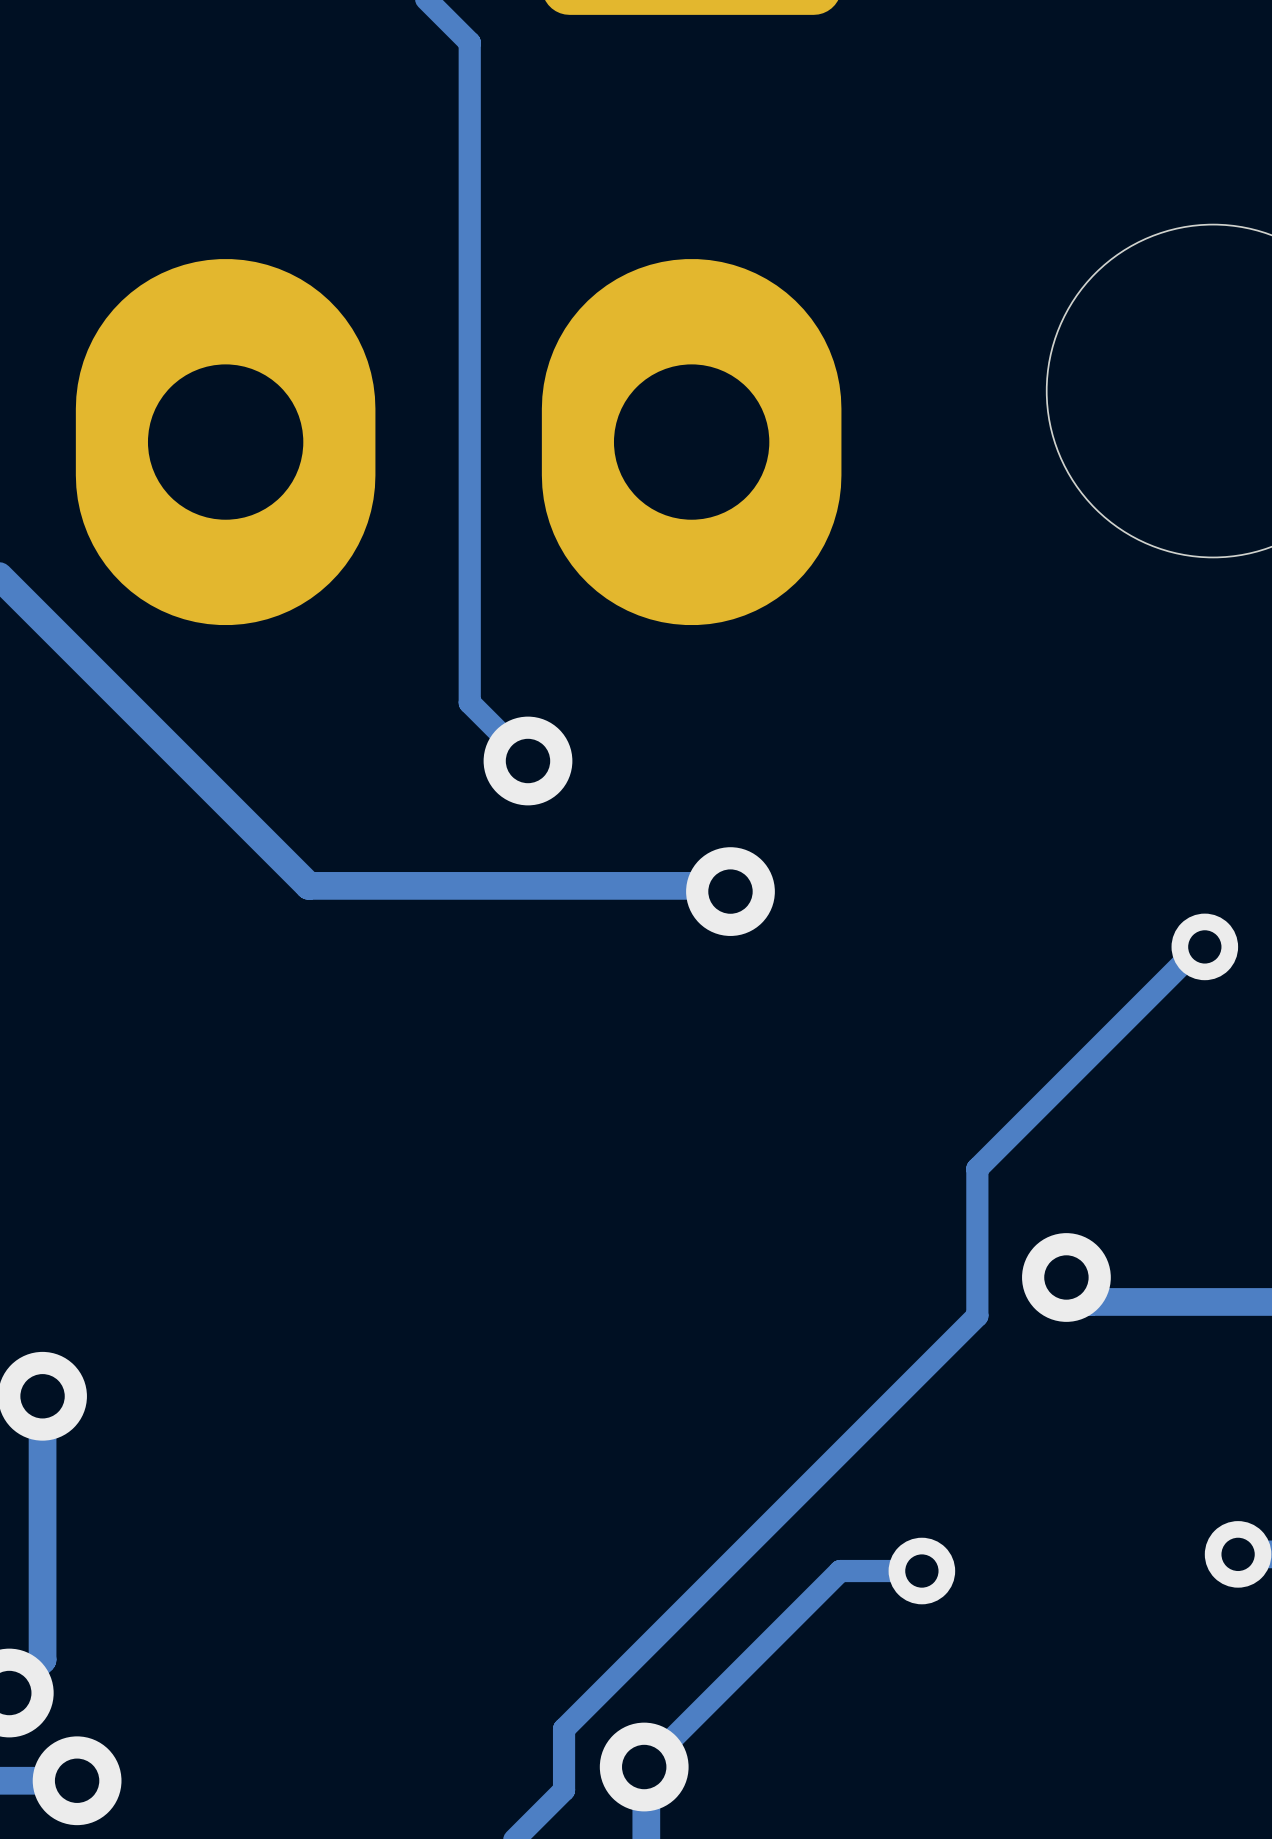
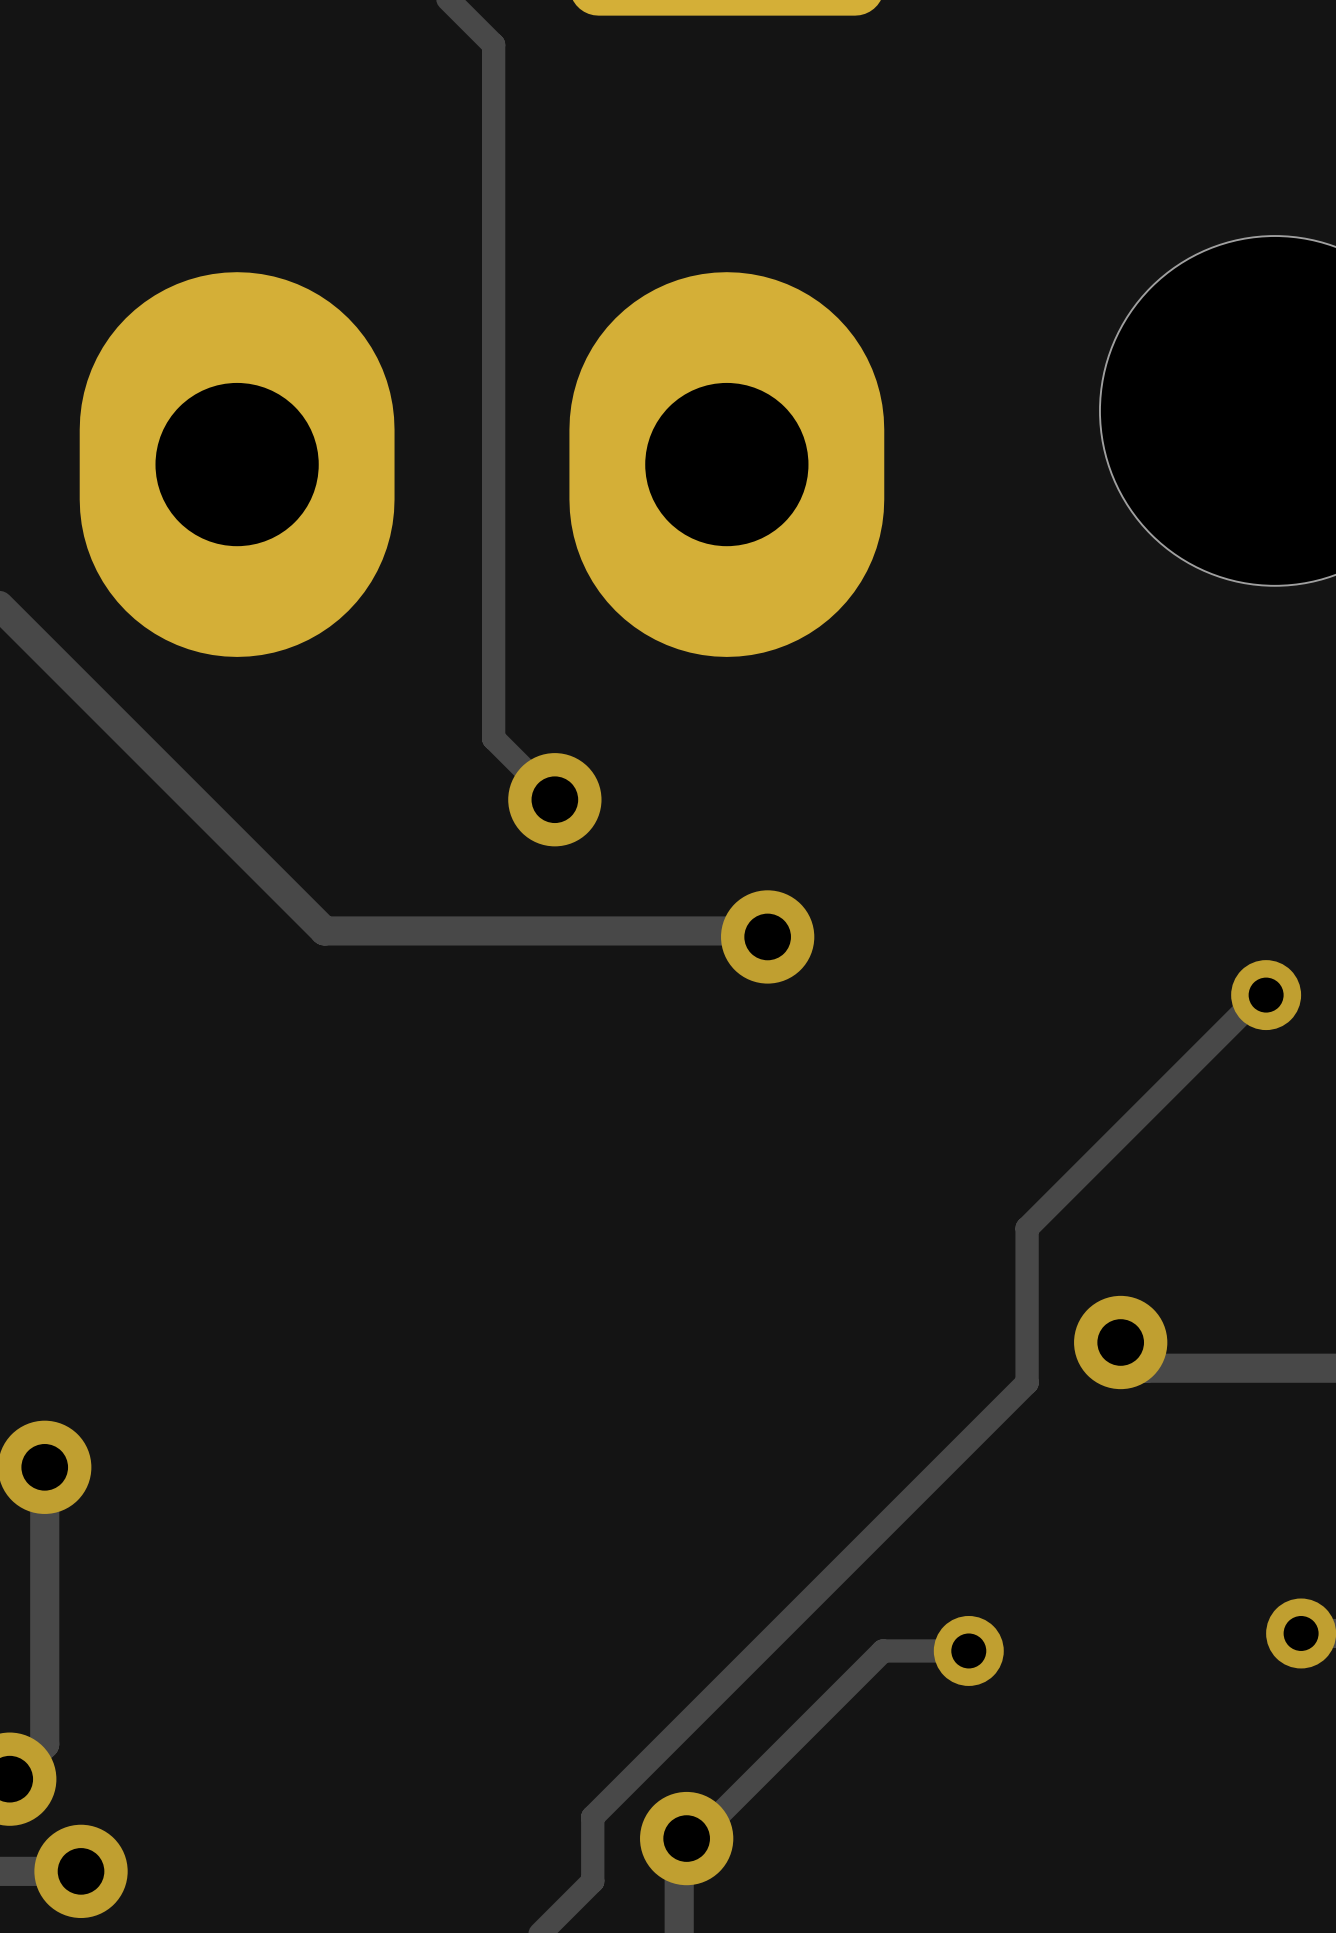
via position: (644, 1767) -> (686, 1838)

